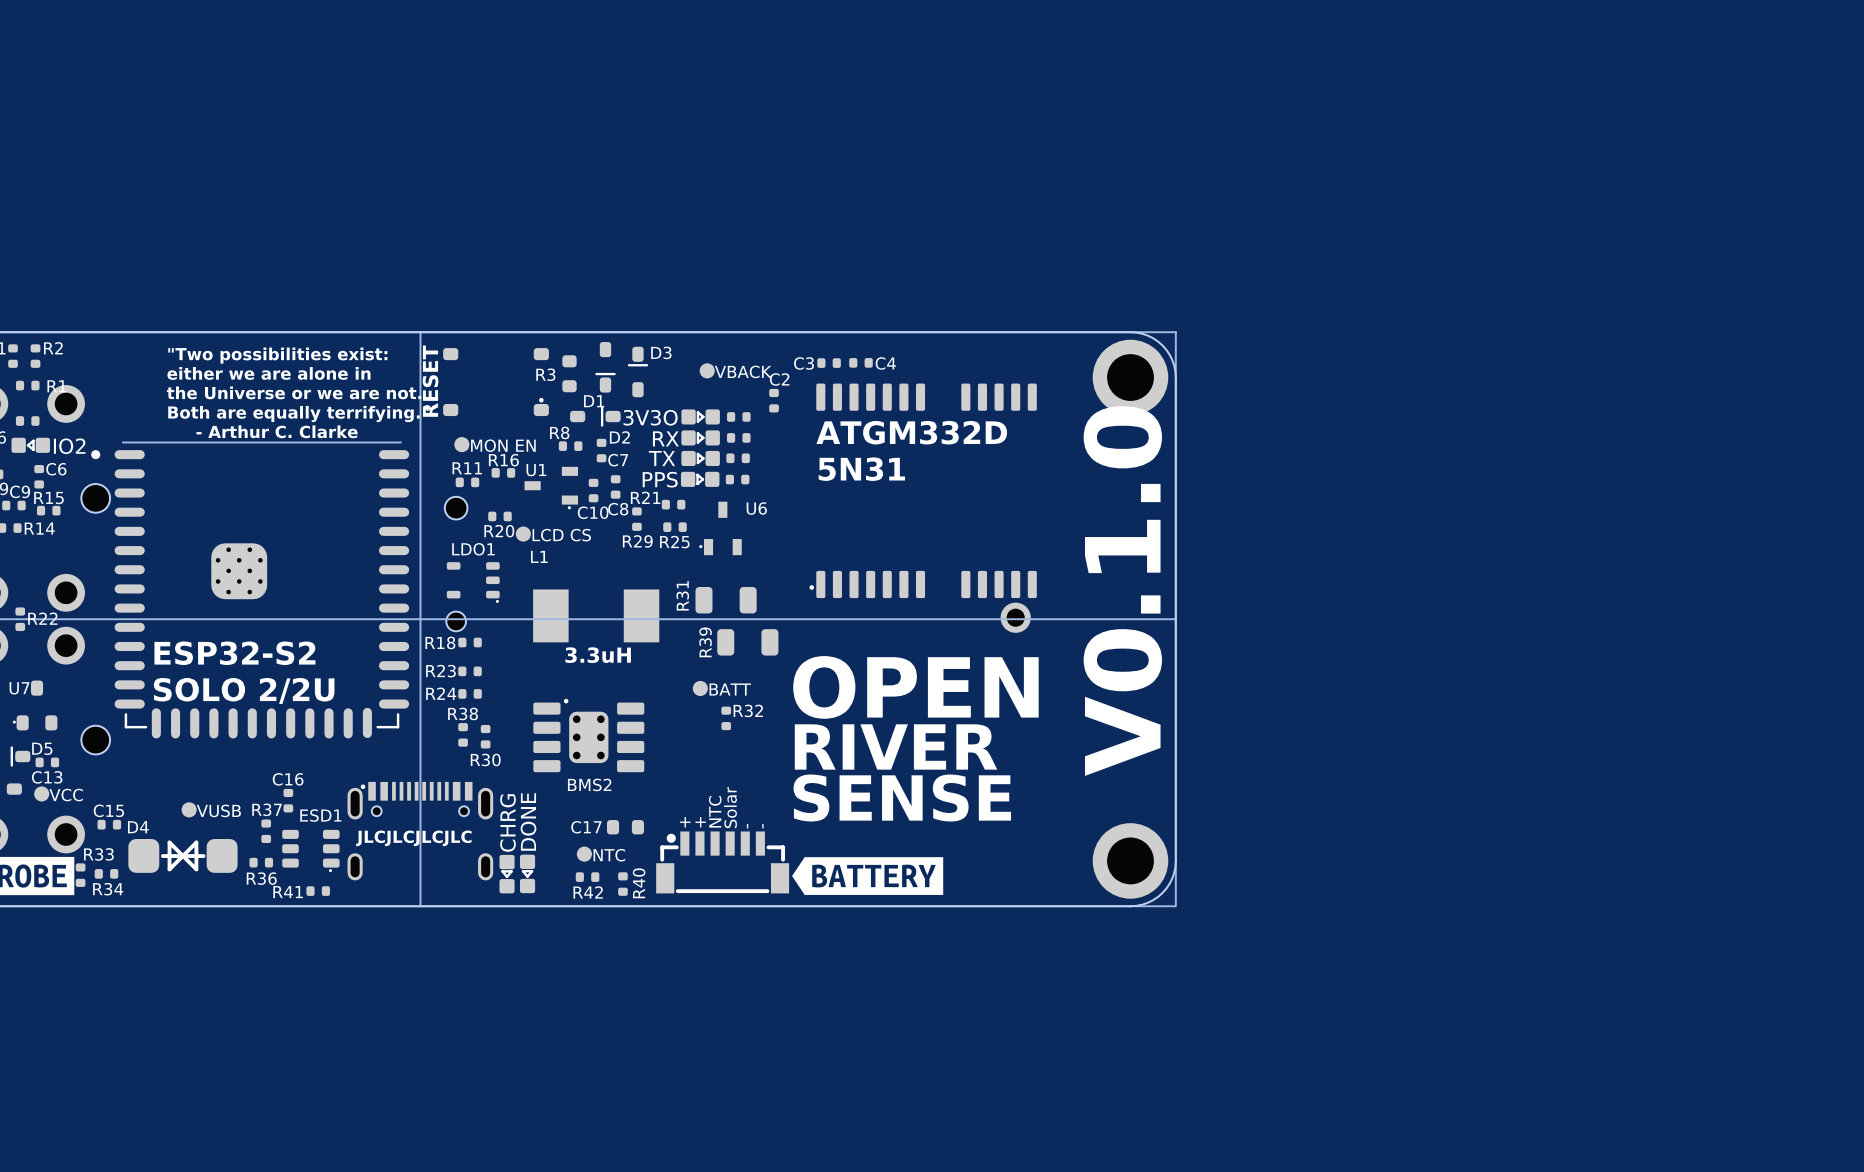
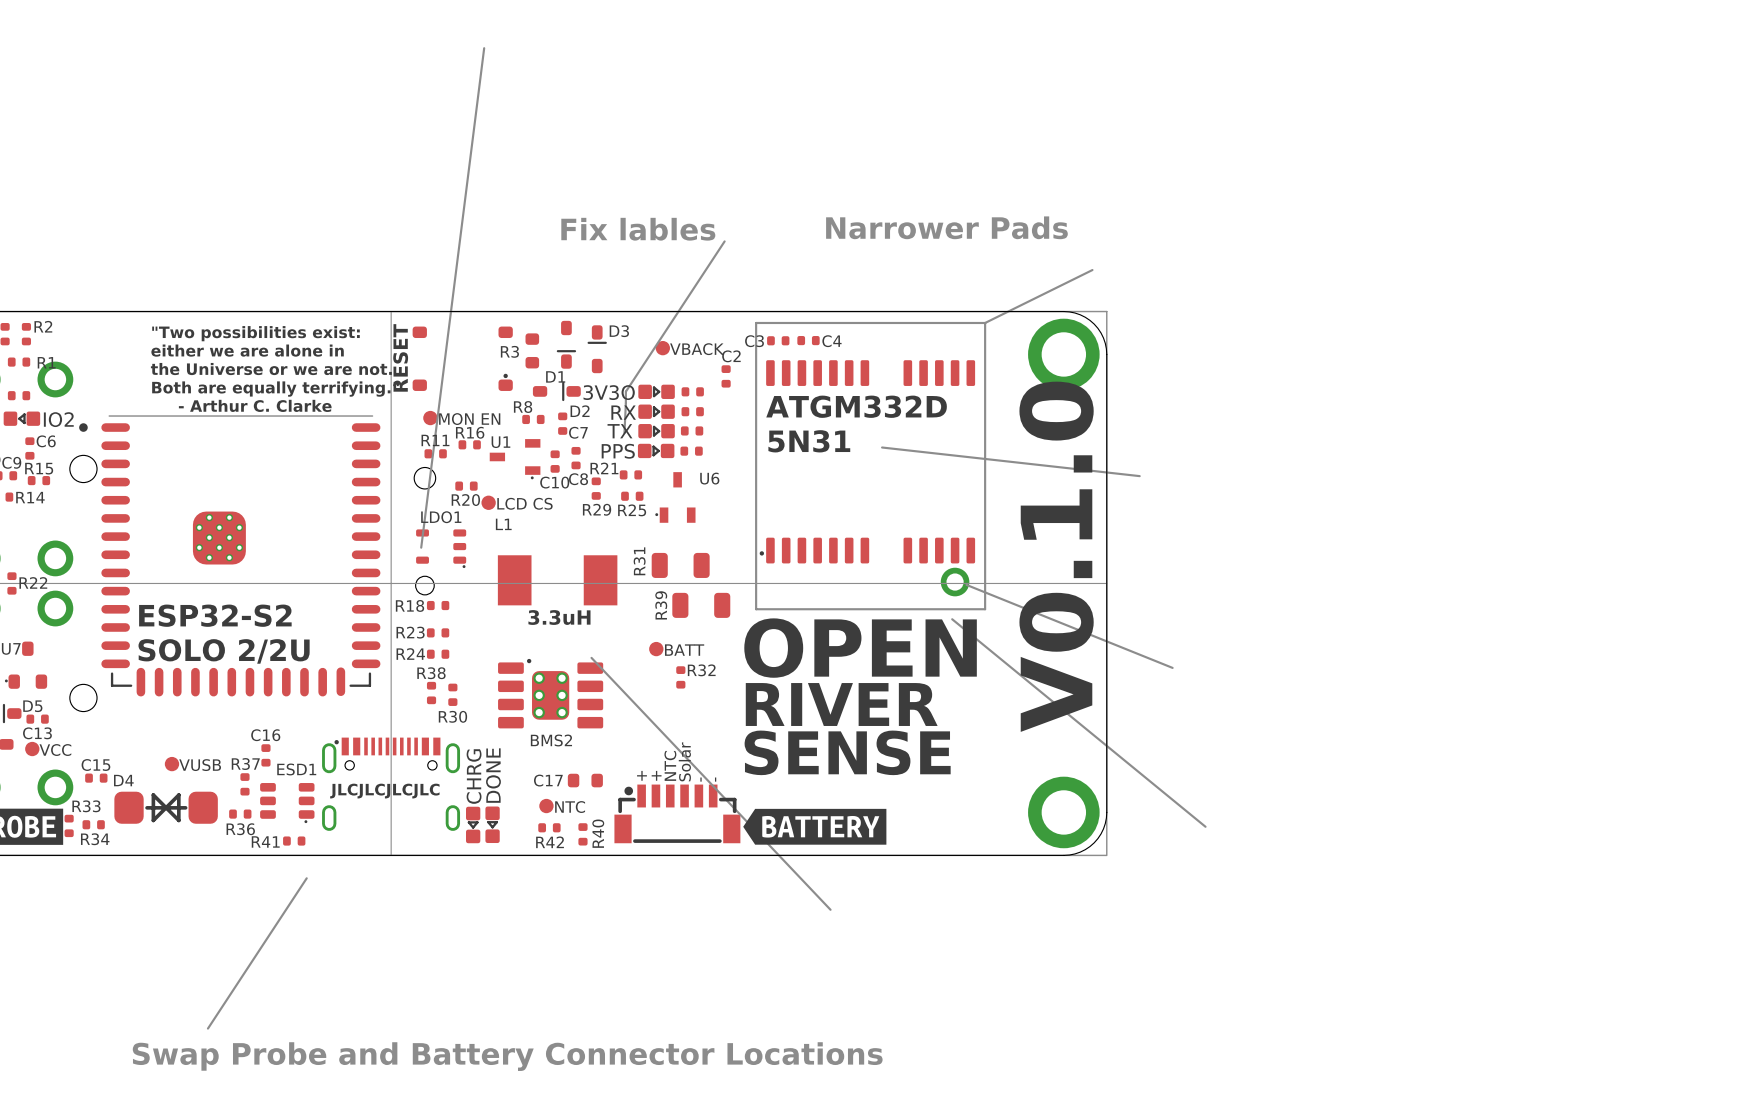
line: none -> (484, 48) (421, 547)
text: none -> Narrower Pads (946, 227)
text: none -> Fix lables (638, 229)
line: none -> (724, 241) (625, 391) (624, 433)
line: none -> (1092, 270) (985, 322)
line: none -> (985, 322) (985, 609) (756, 609) (756, 322) (985, 322)
line: none -> (882, 447) (1139, 476)
line: none -> (966, 584) (1172, 667)
line: none -> (952, 619) (1205, 826)
line: none -> (591, 657) (830, 909)
line: none -> (306, 878) (207, 1028)
text: none -> Swap Probe and Battery Connector Locations (507, 1056)

